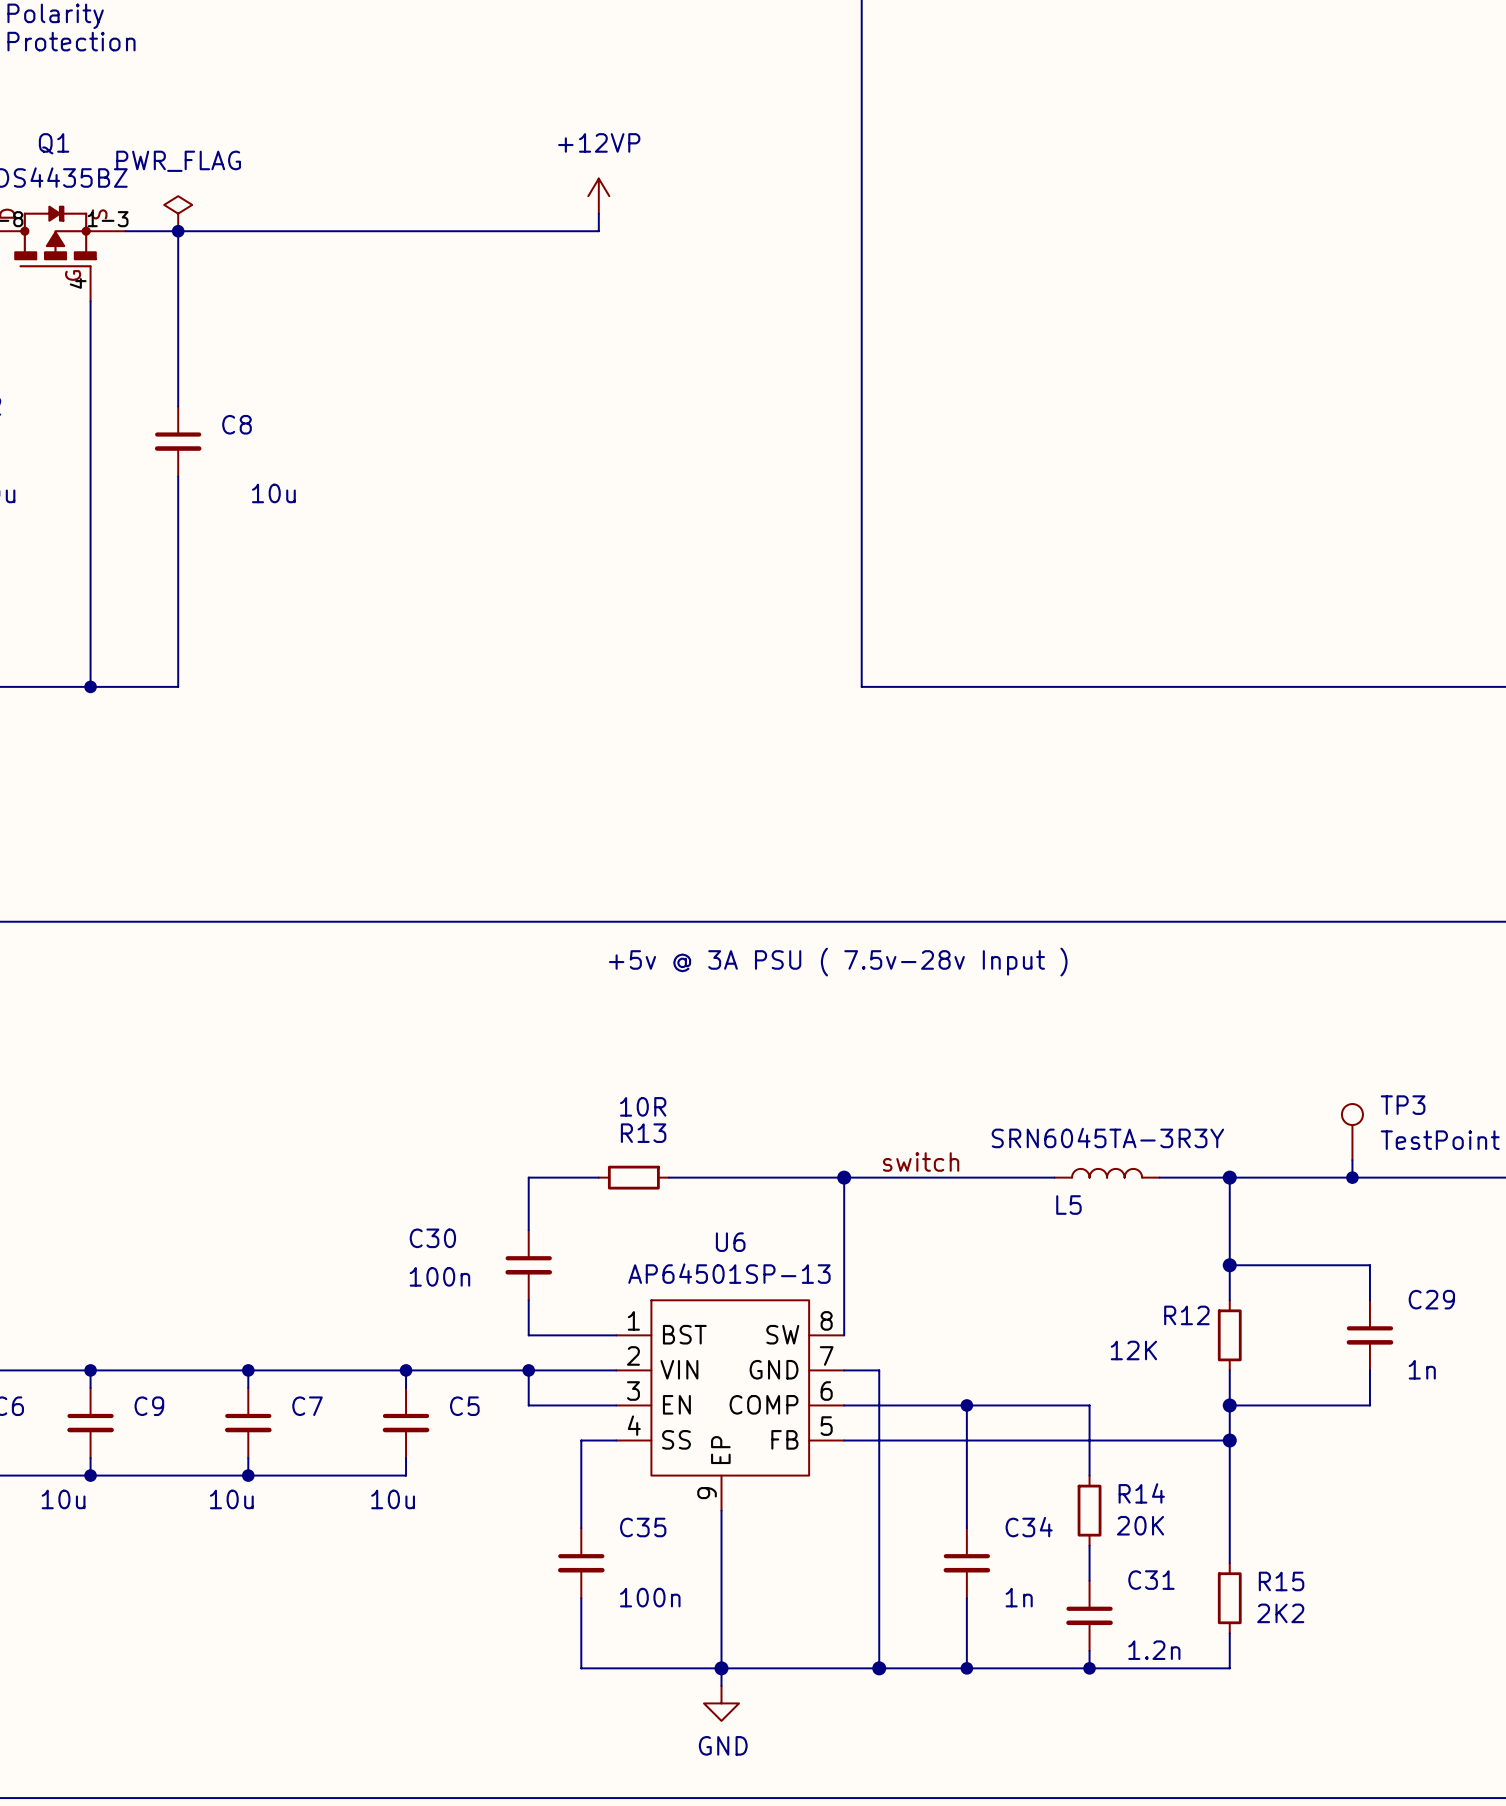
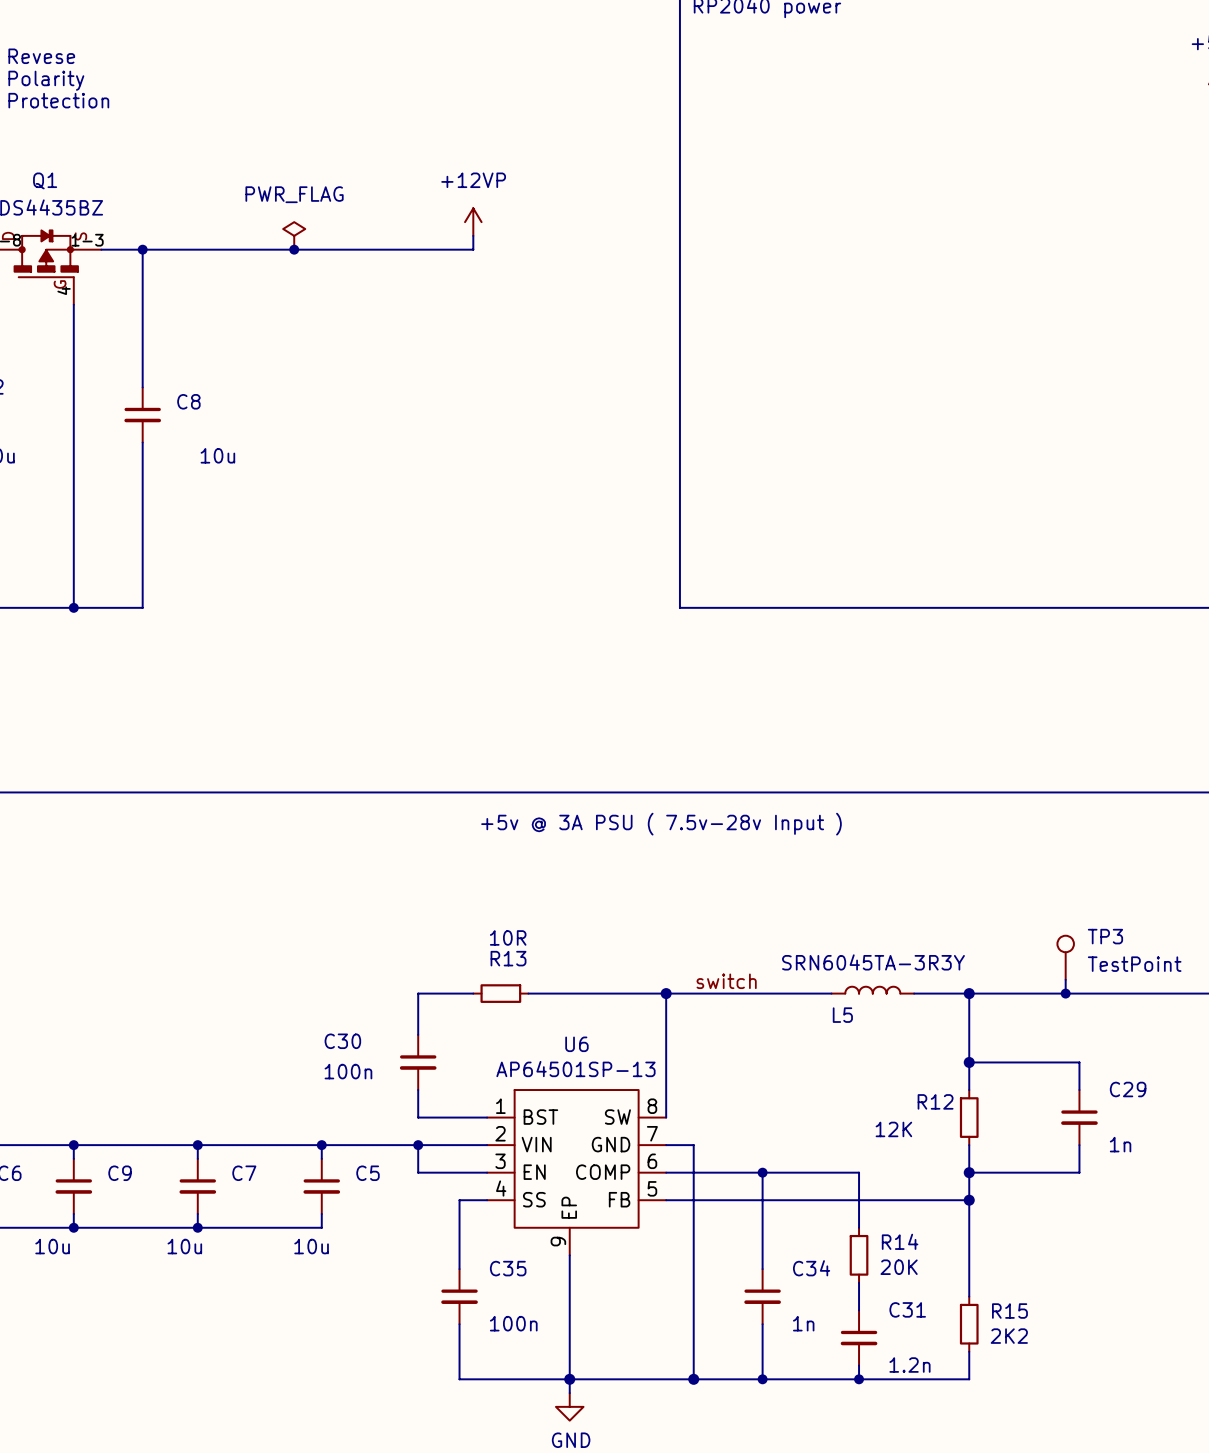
power symbol position: PWR_FLAG (178, 213) -> PWR_FLAG (294, 235)
junction: none -> (294, 249)

